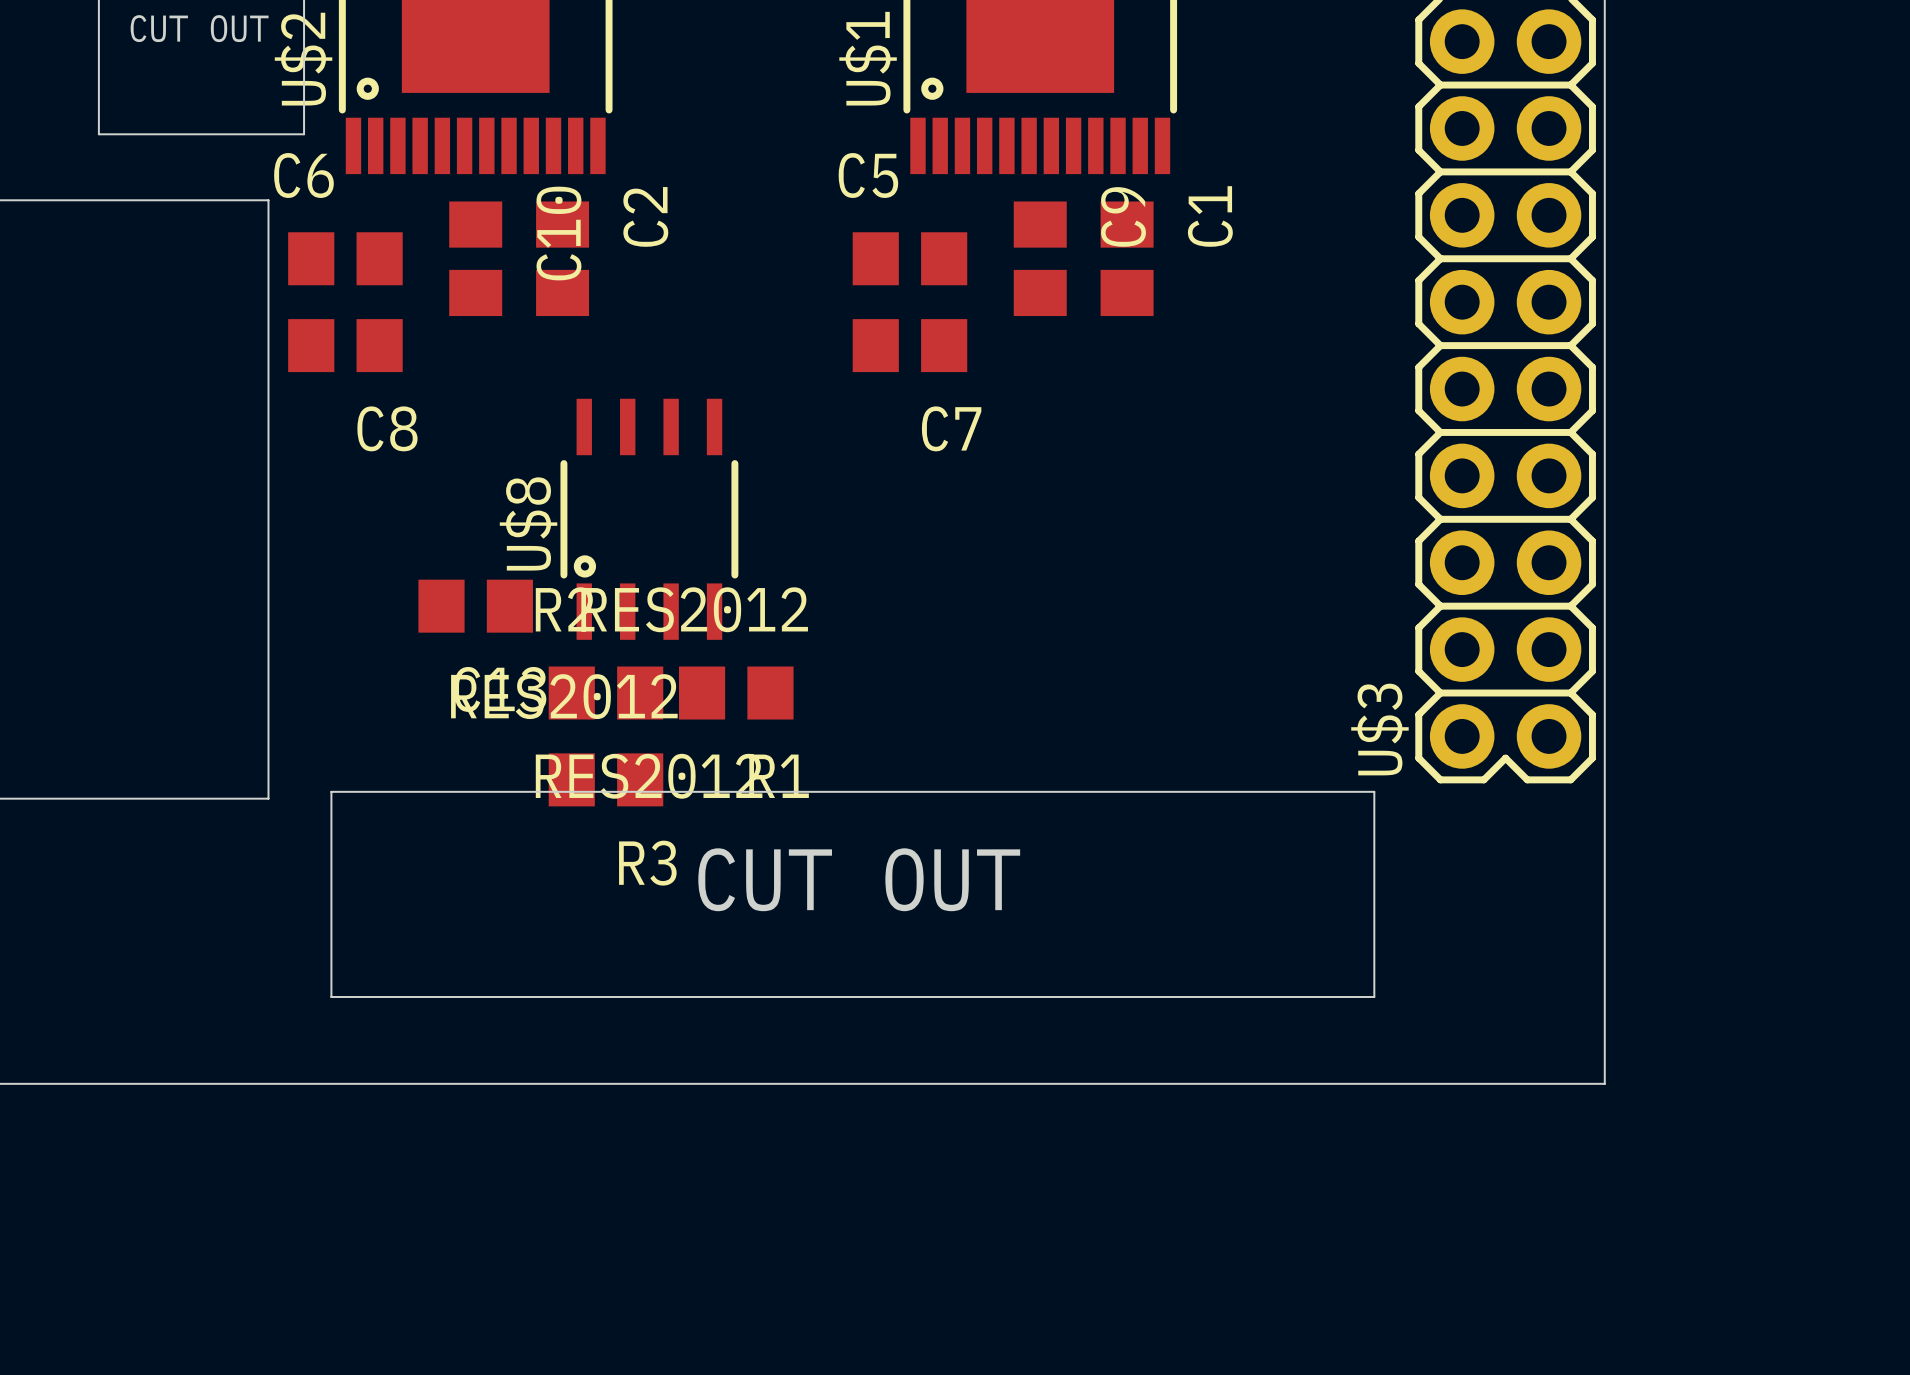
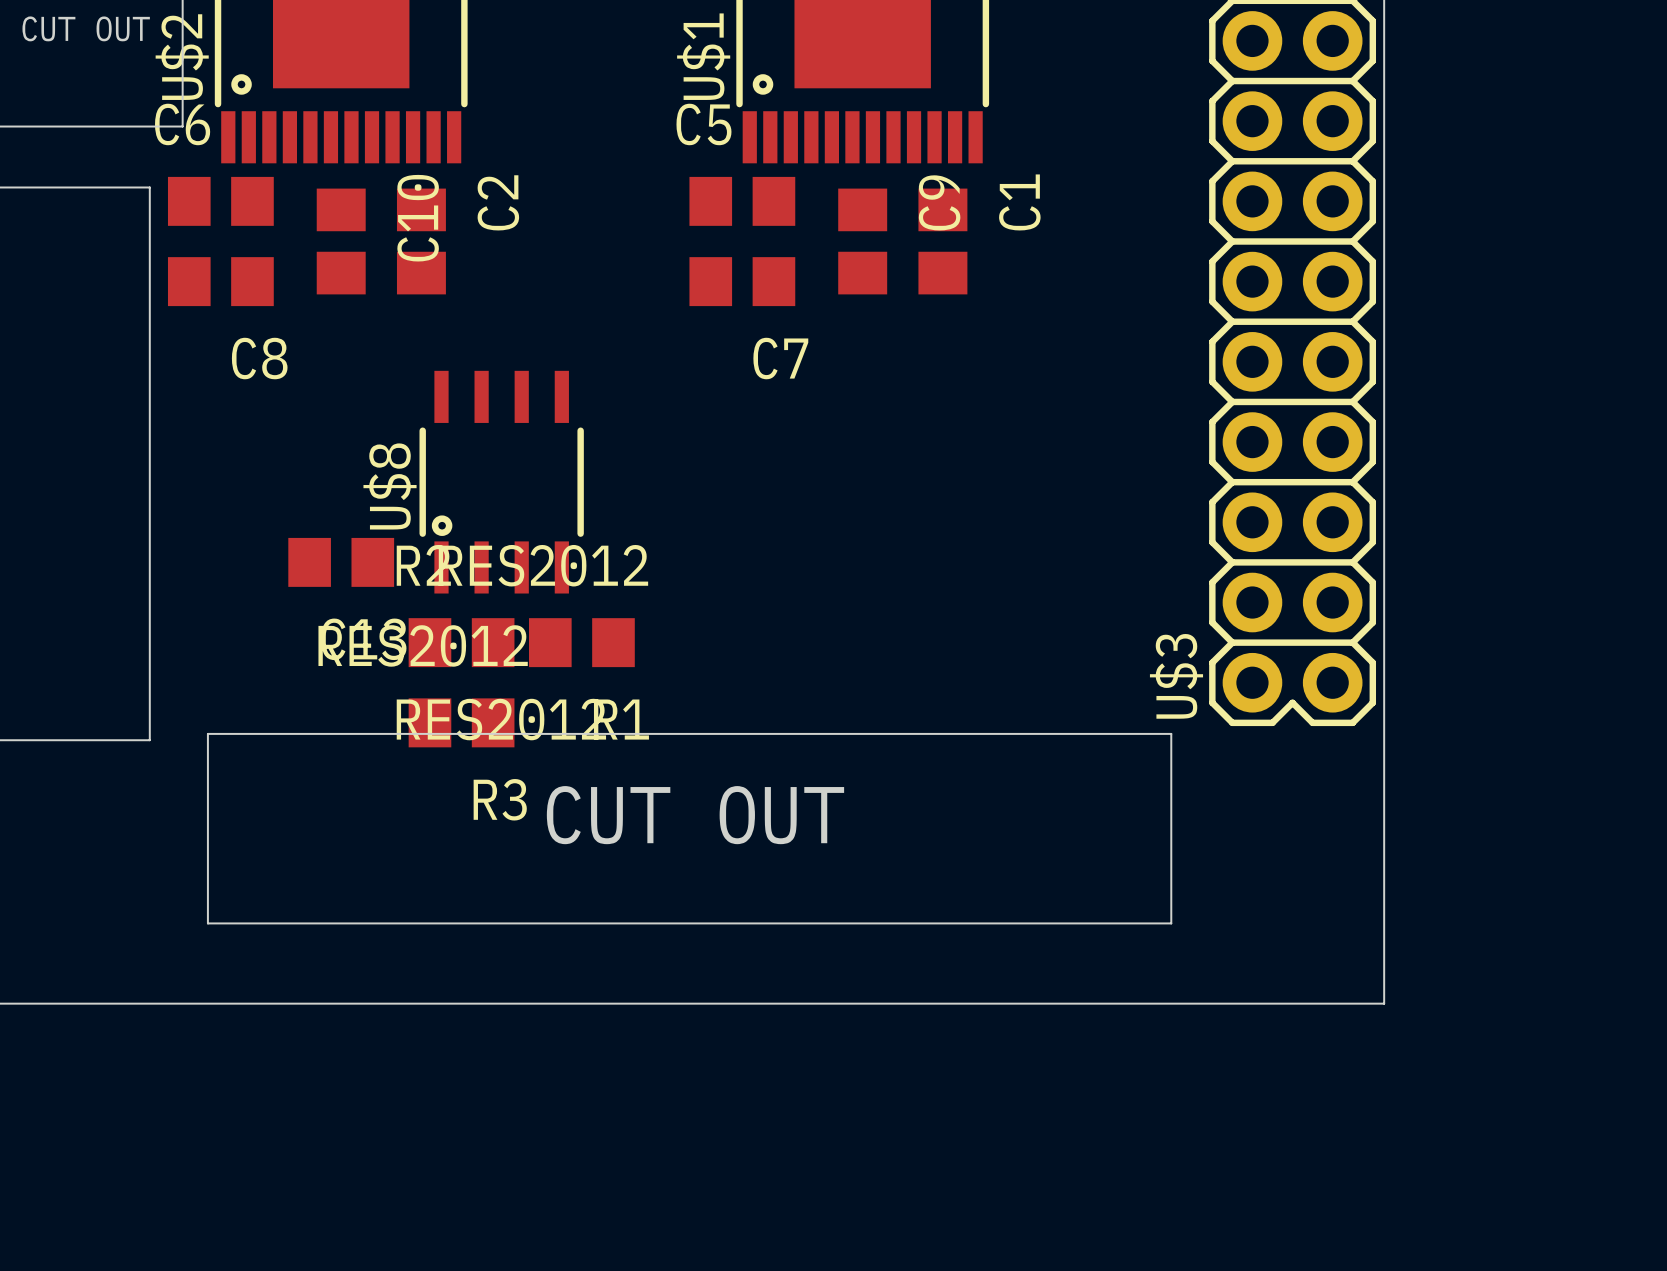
C6 position: (345, 258) -> (220, 201)
C5 position: (909, 258) -> (742, 201)
C8 position: (345, 345) -> (220, 281)
C7 position: (909, 345) -> (742, 281)

